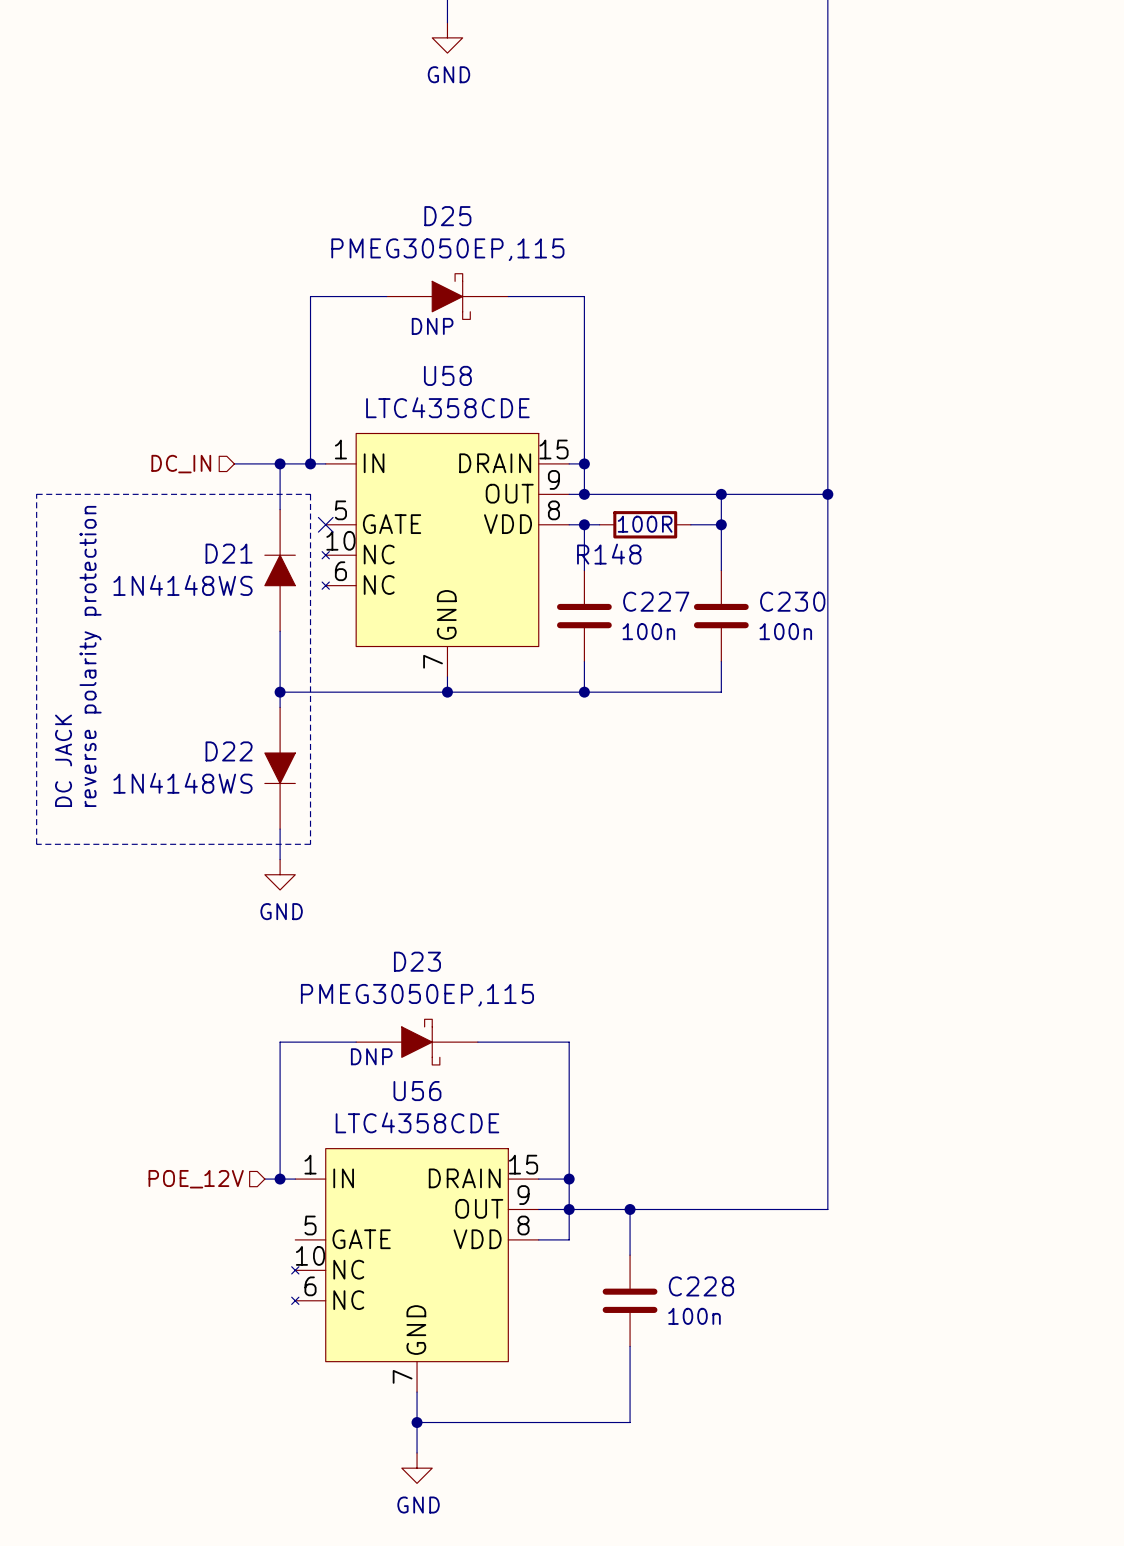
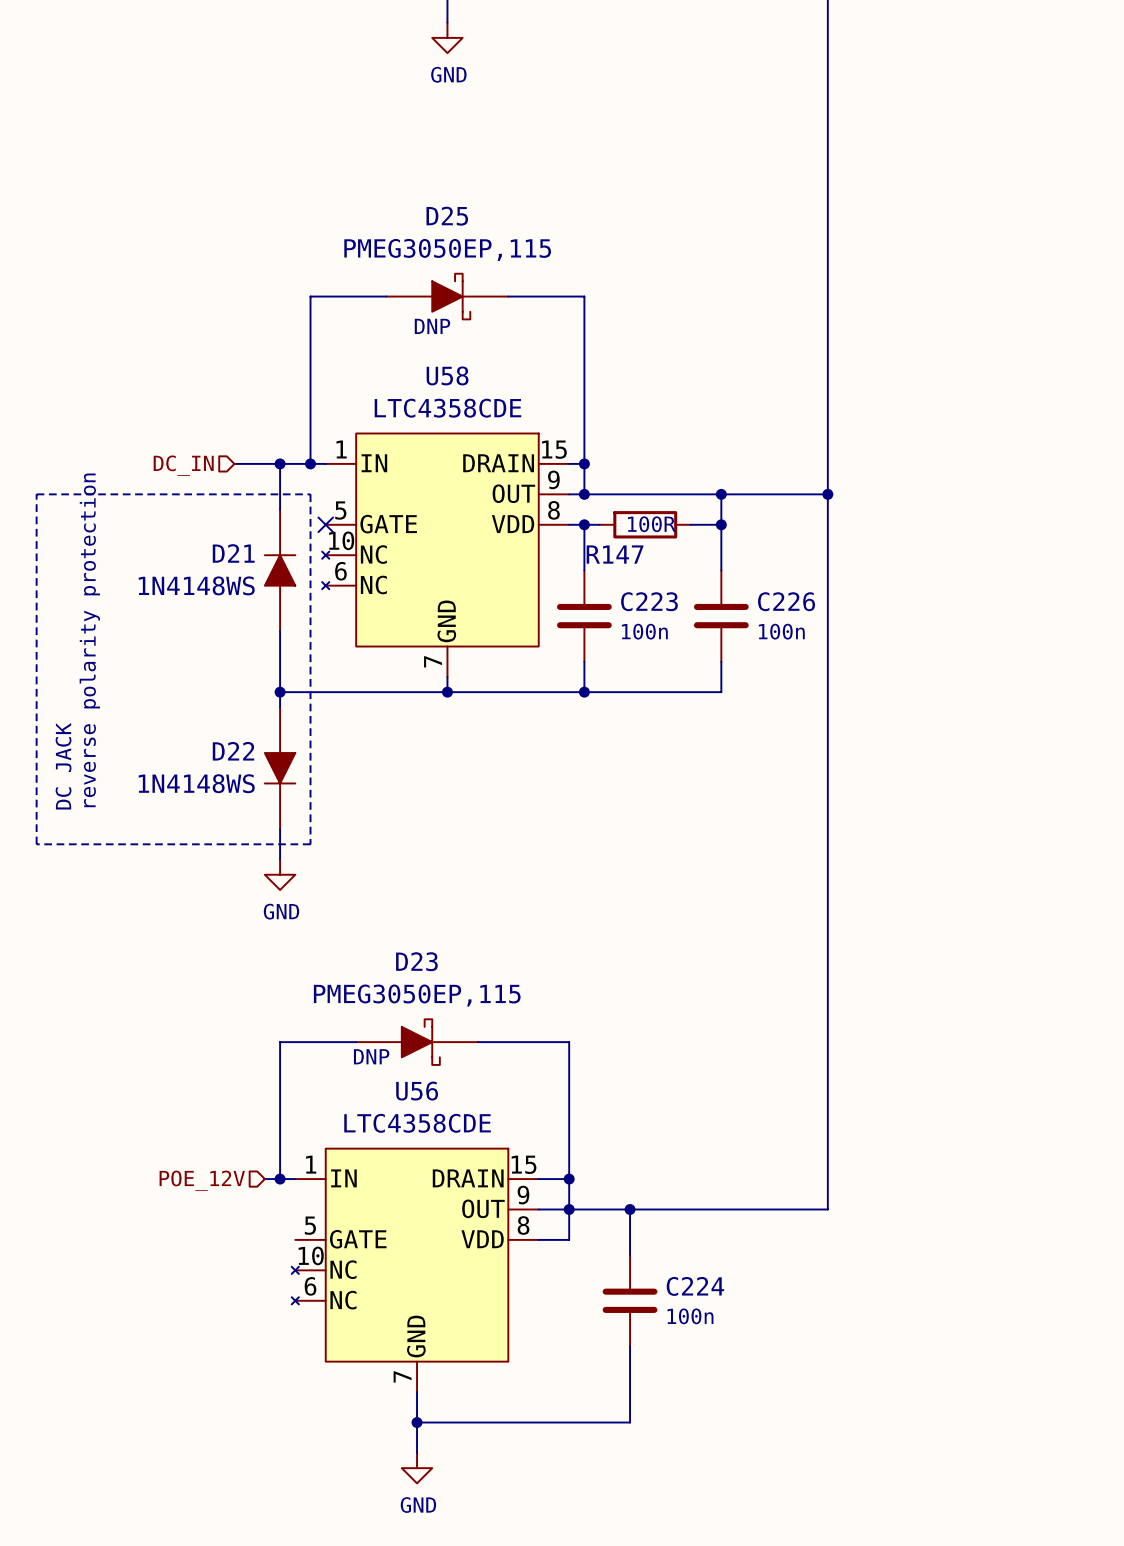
R148 name: R148 (609, 554) -> R147 (615, 554)
C227 name: C227 (656, 601) -> C223 (649, 601)
C230 name: C230 (792, 601) -> C226 (786, 601)
C228 name: C228 (701, 1286) -> C224 (695, 1286)

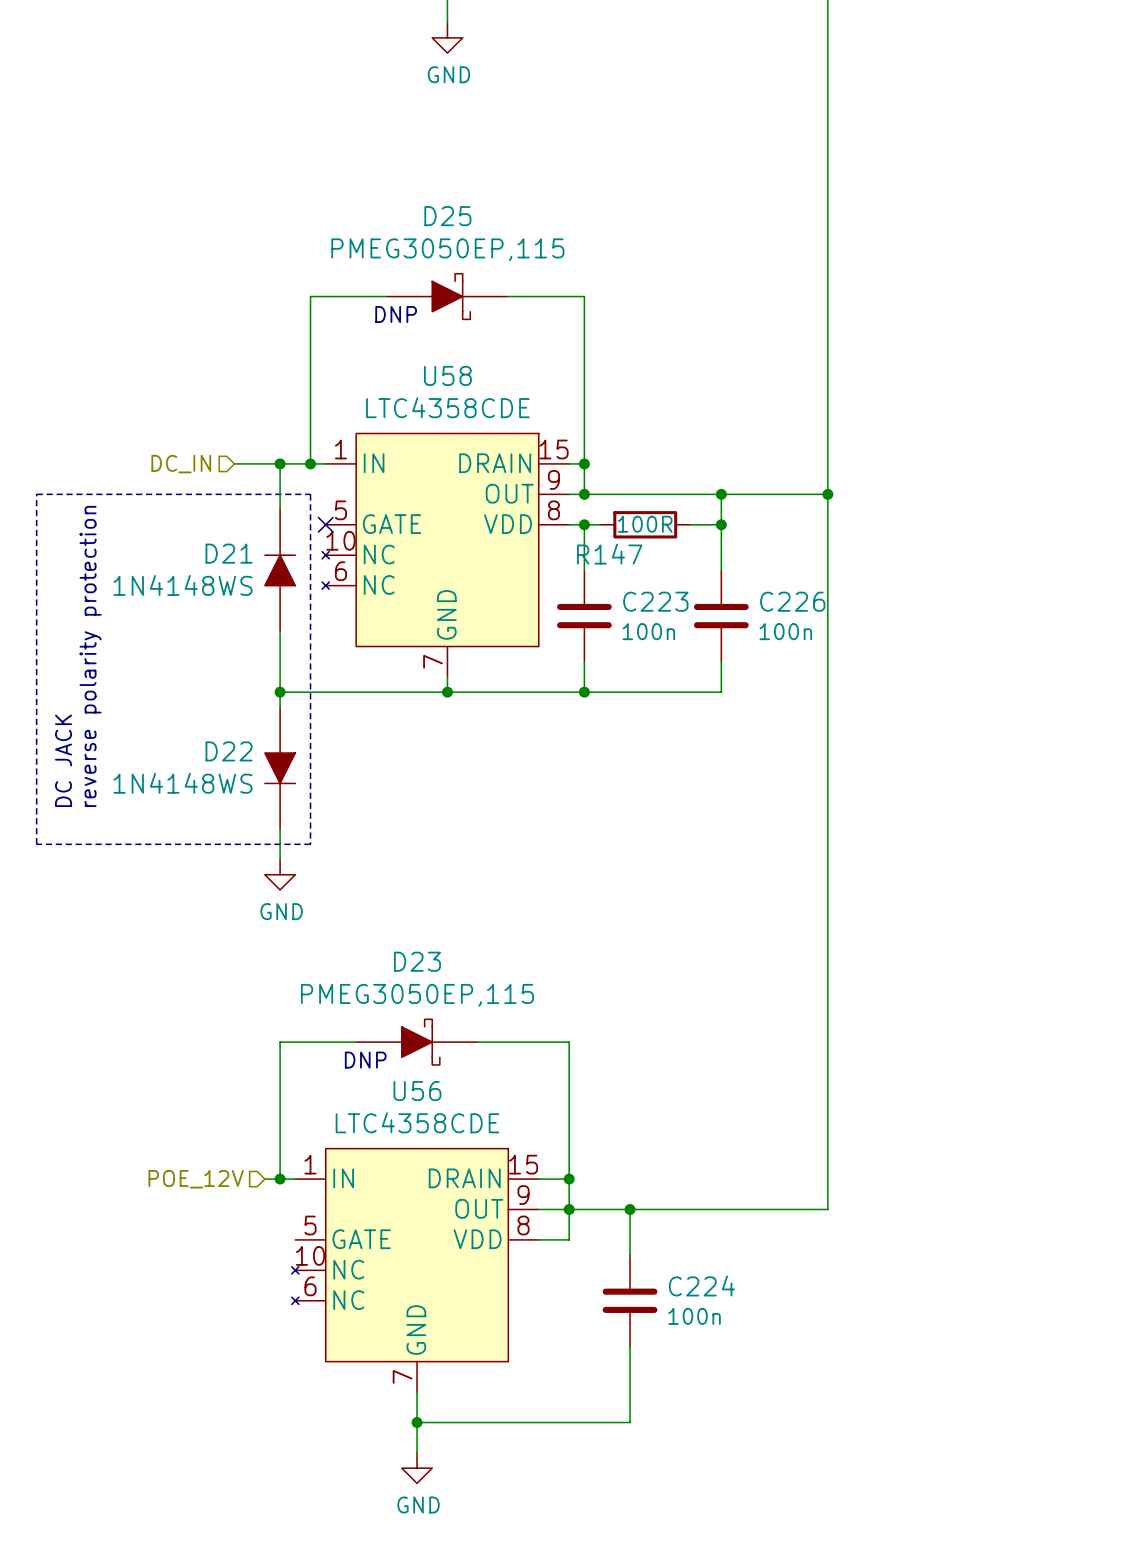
text: none -> DNP (396, 314)
D25 text: DNP (432, 326) -> none
D23 text: DNP (371, 1056) -> none
text: none -> DNP (365, 1060)

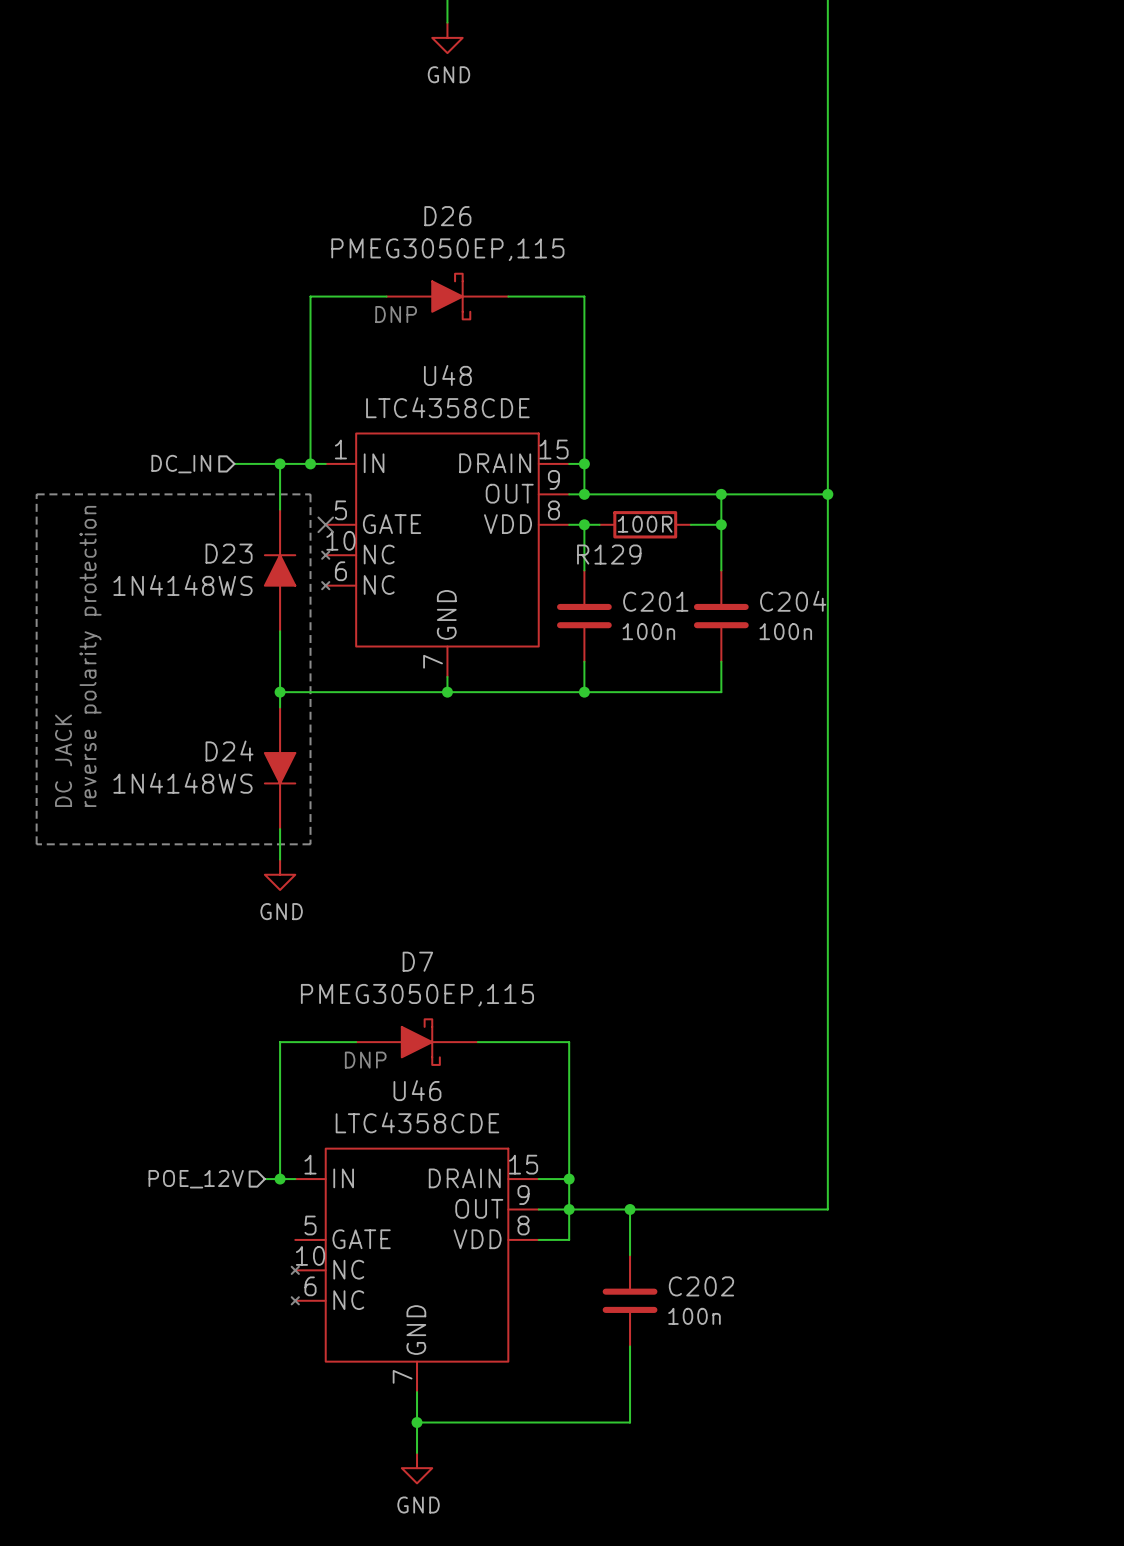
D25 name: D25 (447, 216) -> D26 (447, 216)
U58 name: U58 (447, 375) -> U48 (447, 375)
D21 name: D21 (229, 553) -> D23 (229, 553)
R147 name: R147 (609, 554) -> R129 (609, 554)
C223 name: C223 (655, 601) -> C201 (655, 601)
C226 name: C226 (792, 601) -> C204 (793, 601)
D22 name: D22 (229, 751) -> D24 (229, 750)
D23 name: D23 (417, 961) -> D7 (417, 961)
U56 name: U56 (417, 1091) -> U46 (417, 1090)
C224 name: C224 (701, 1285) -> C202 (701, 1286)

